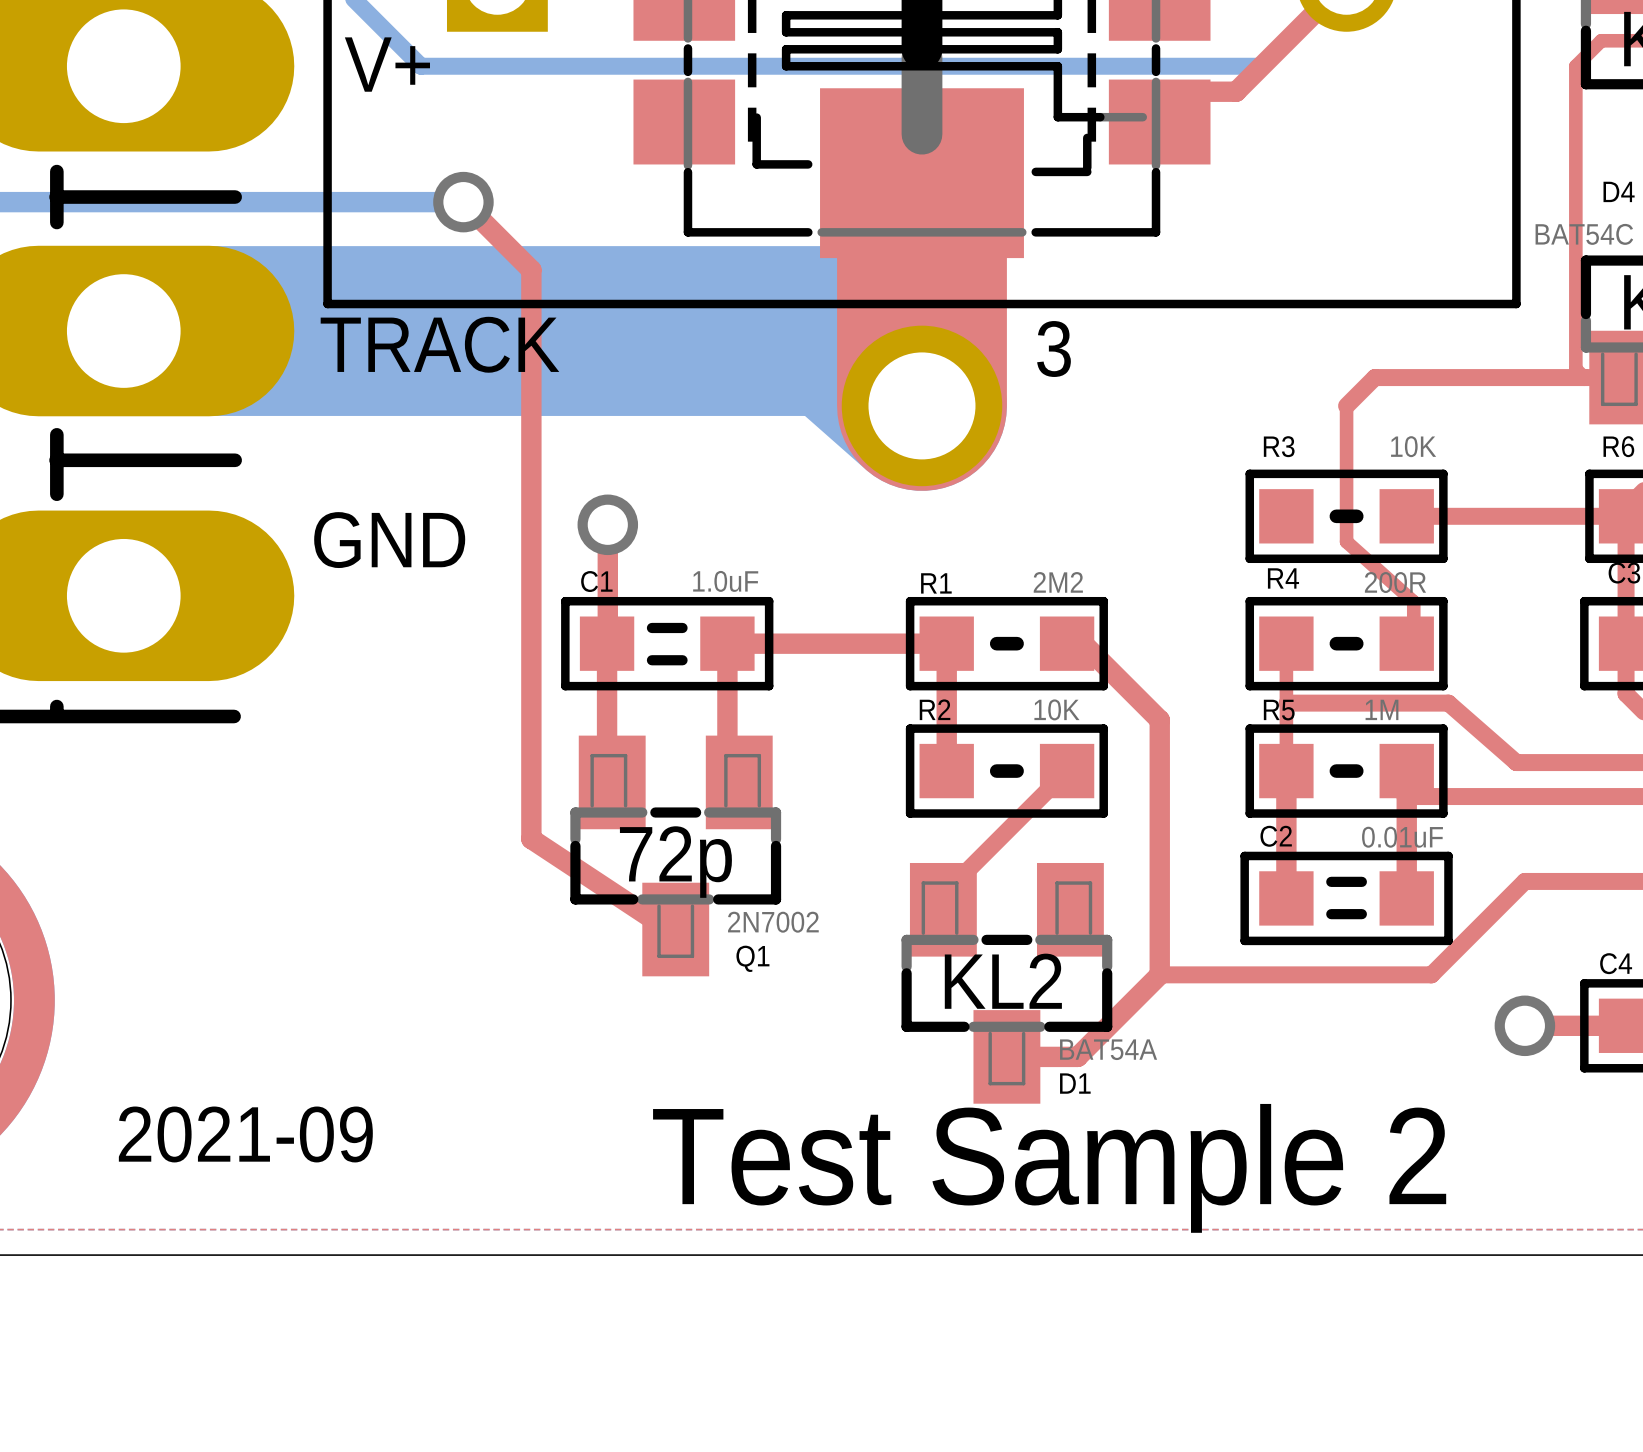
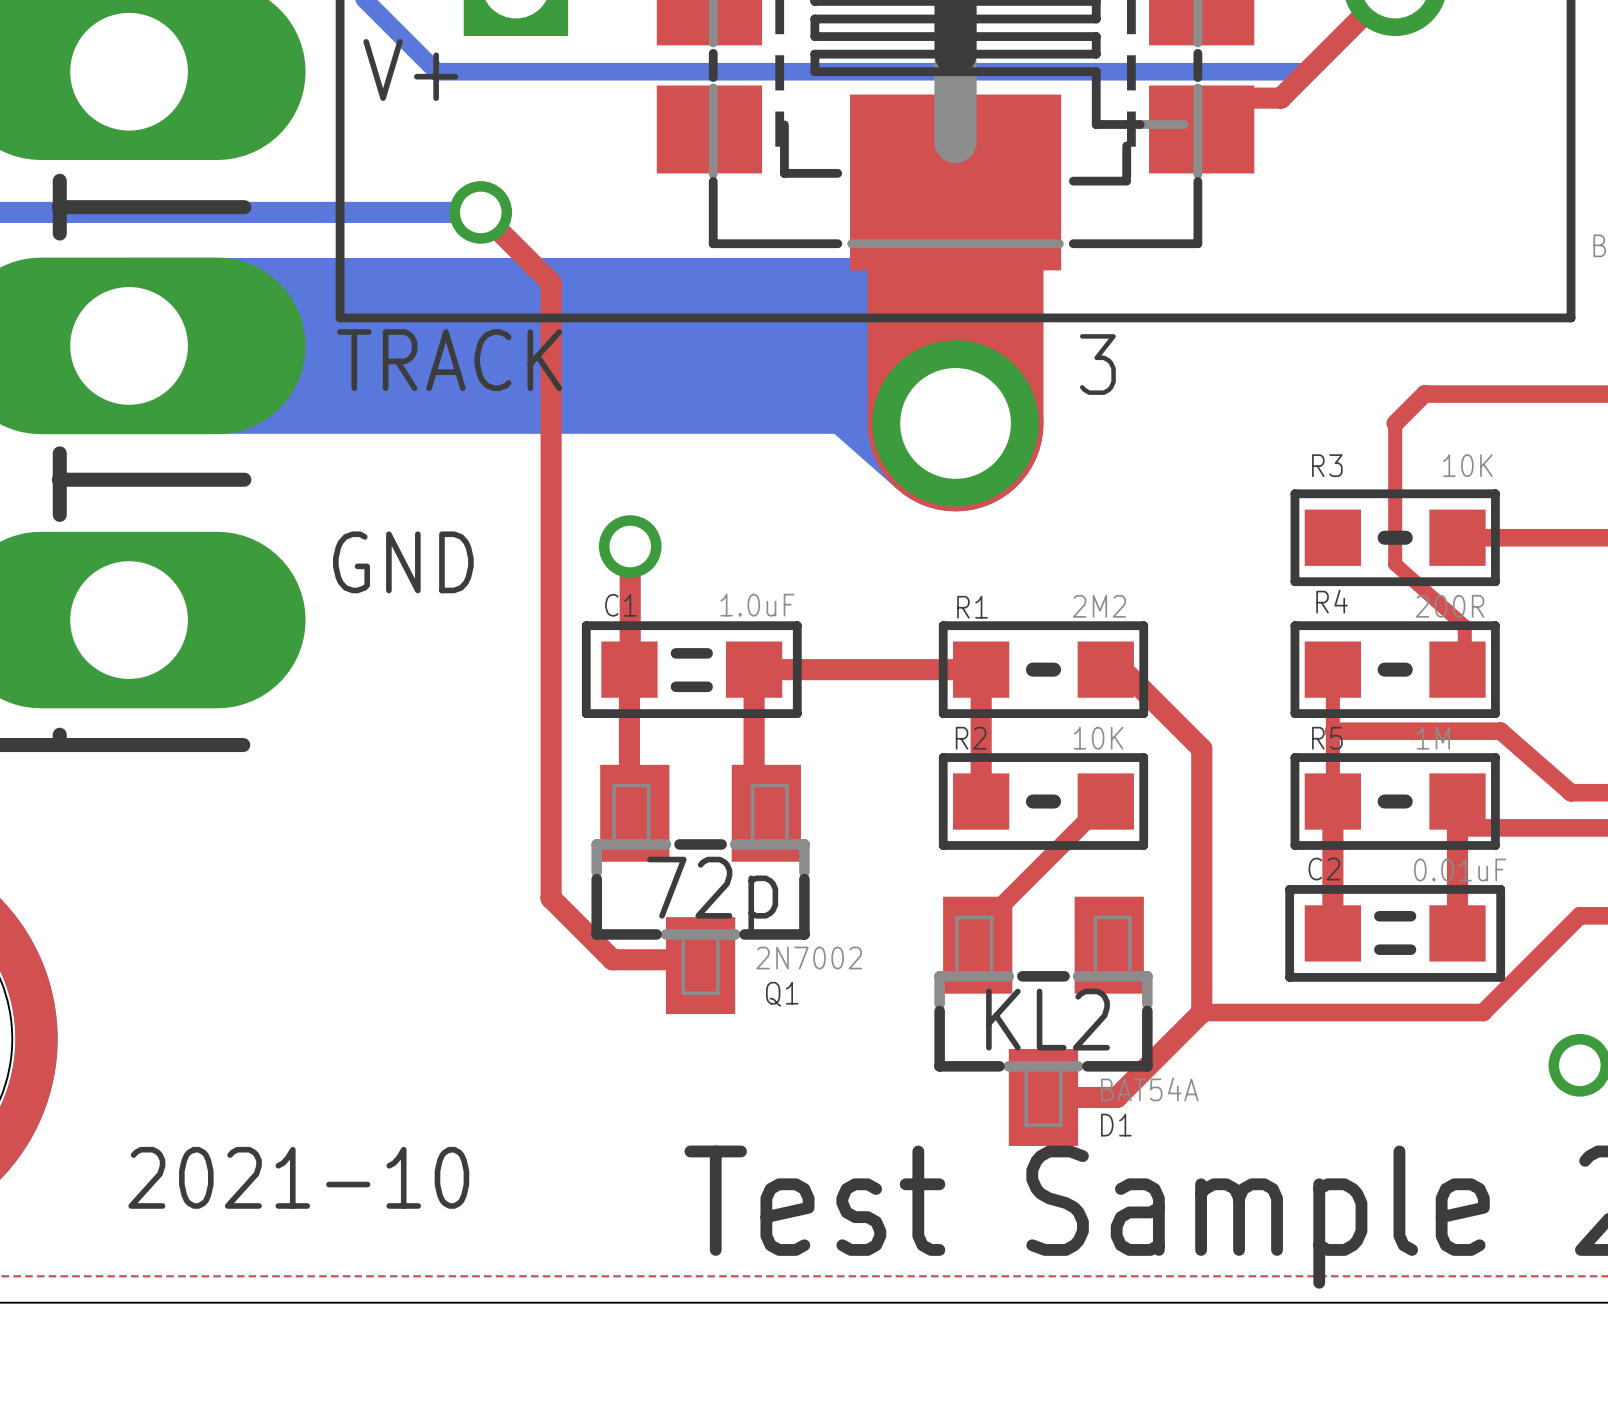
top track: (531, 838) (672, 932) -> (551, 871) (551, 898) (612, 959) (694, 959) (700, 965)
text: 2021-09 (245, 1134) -> 2021-10 (298, 1177)

